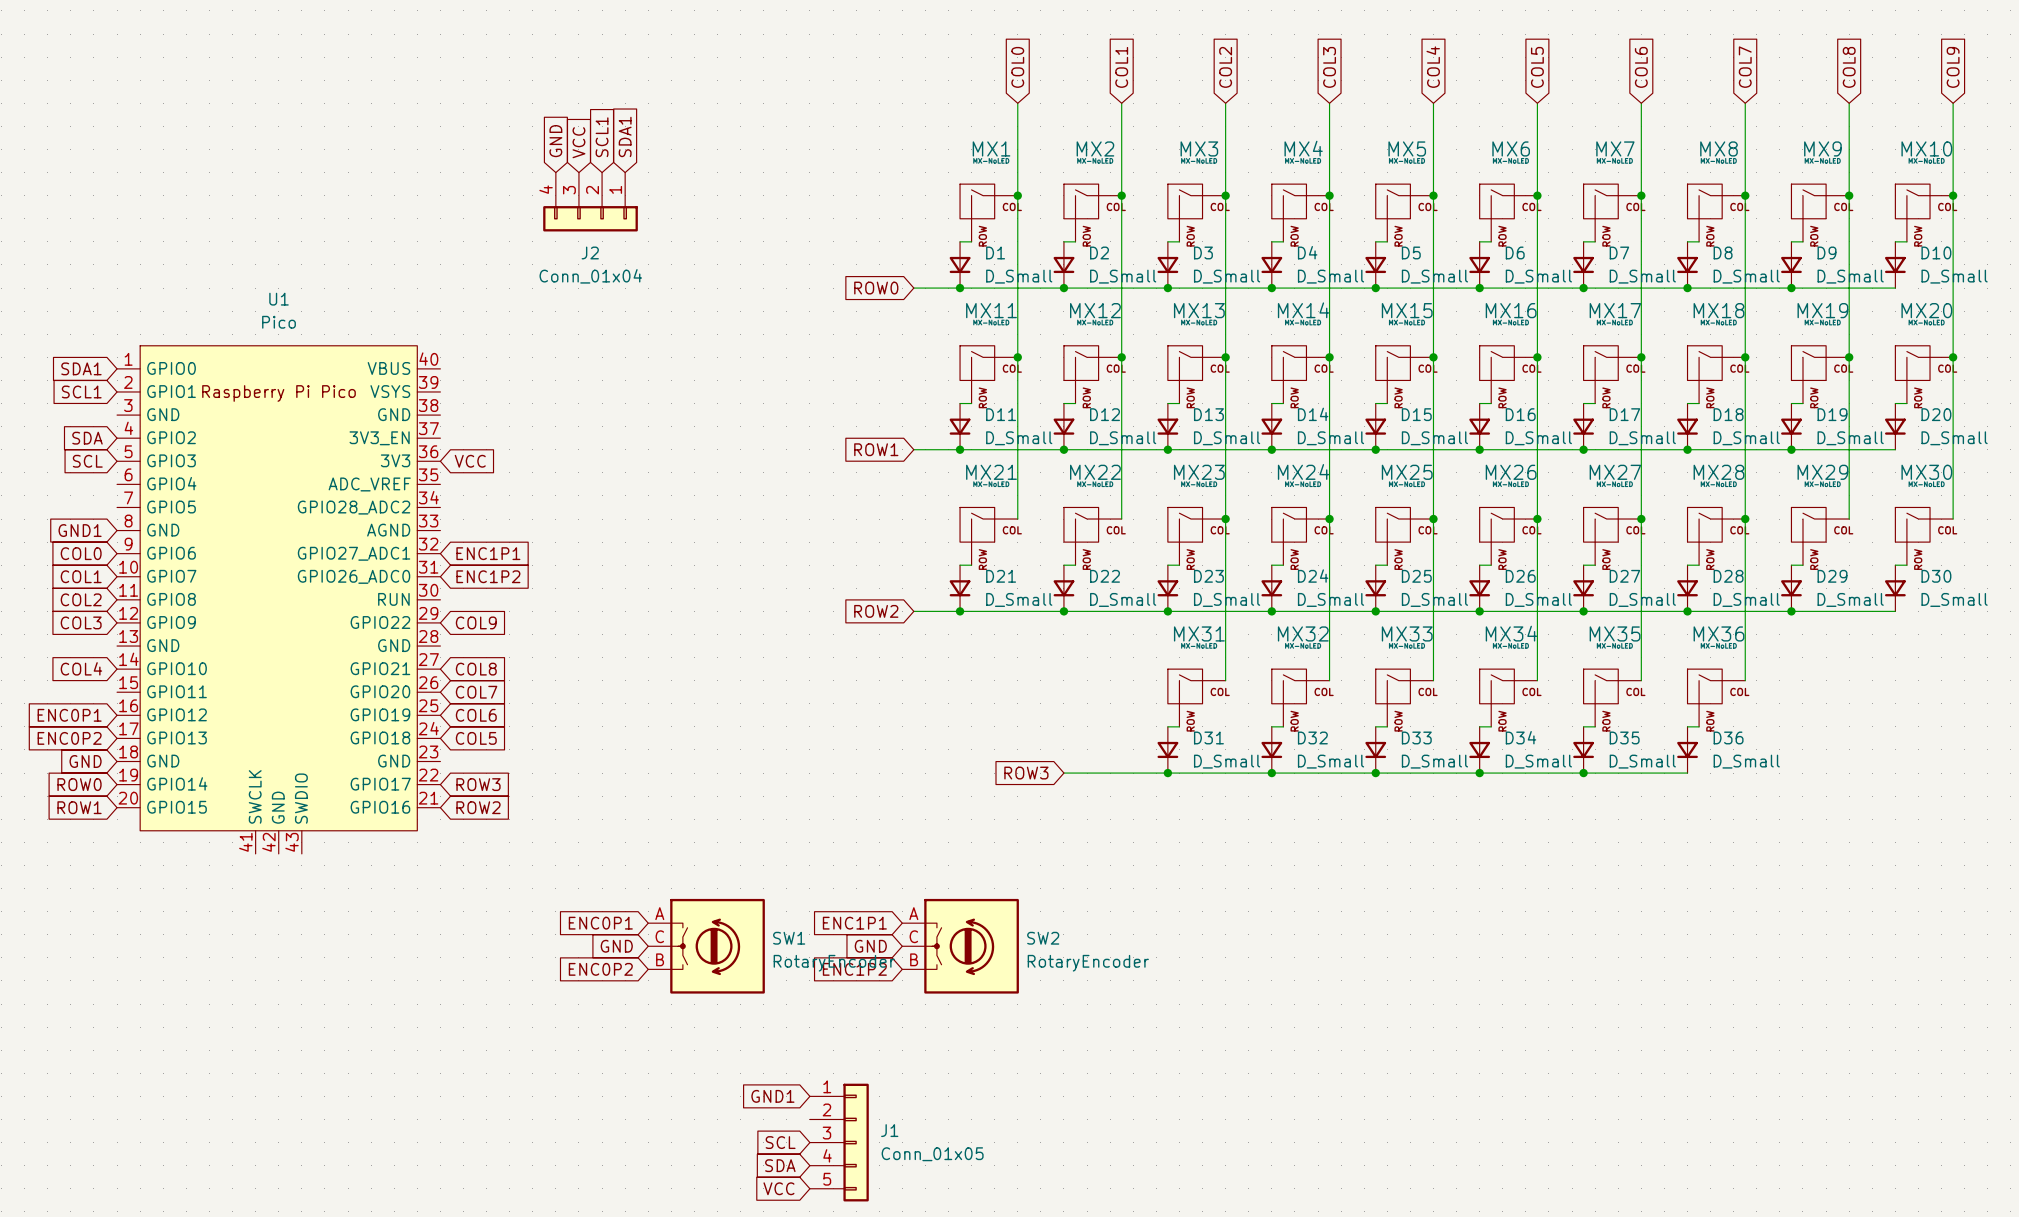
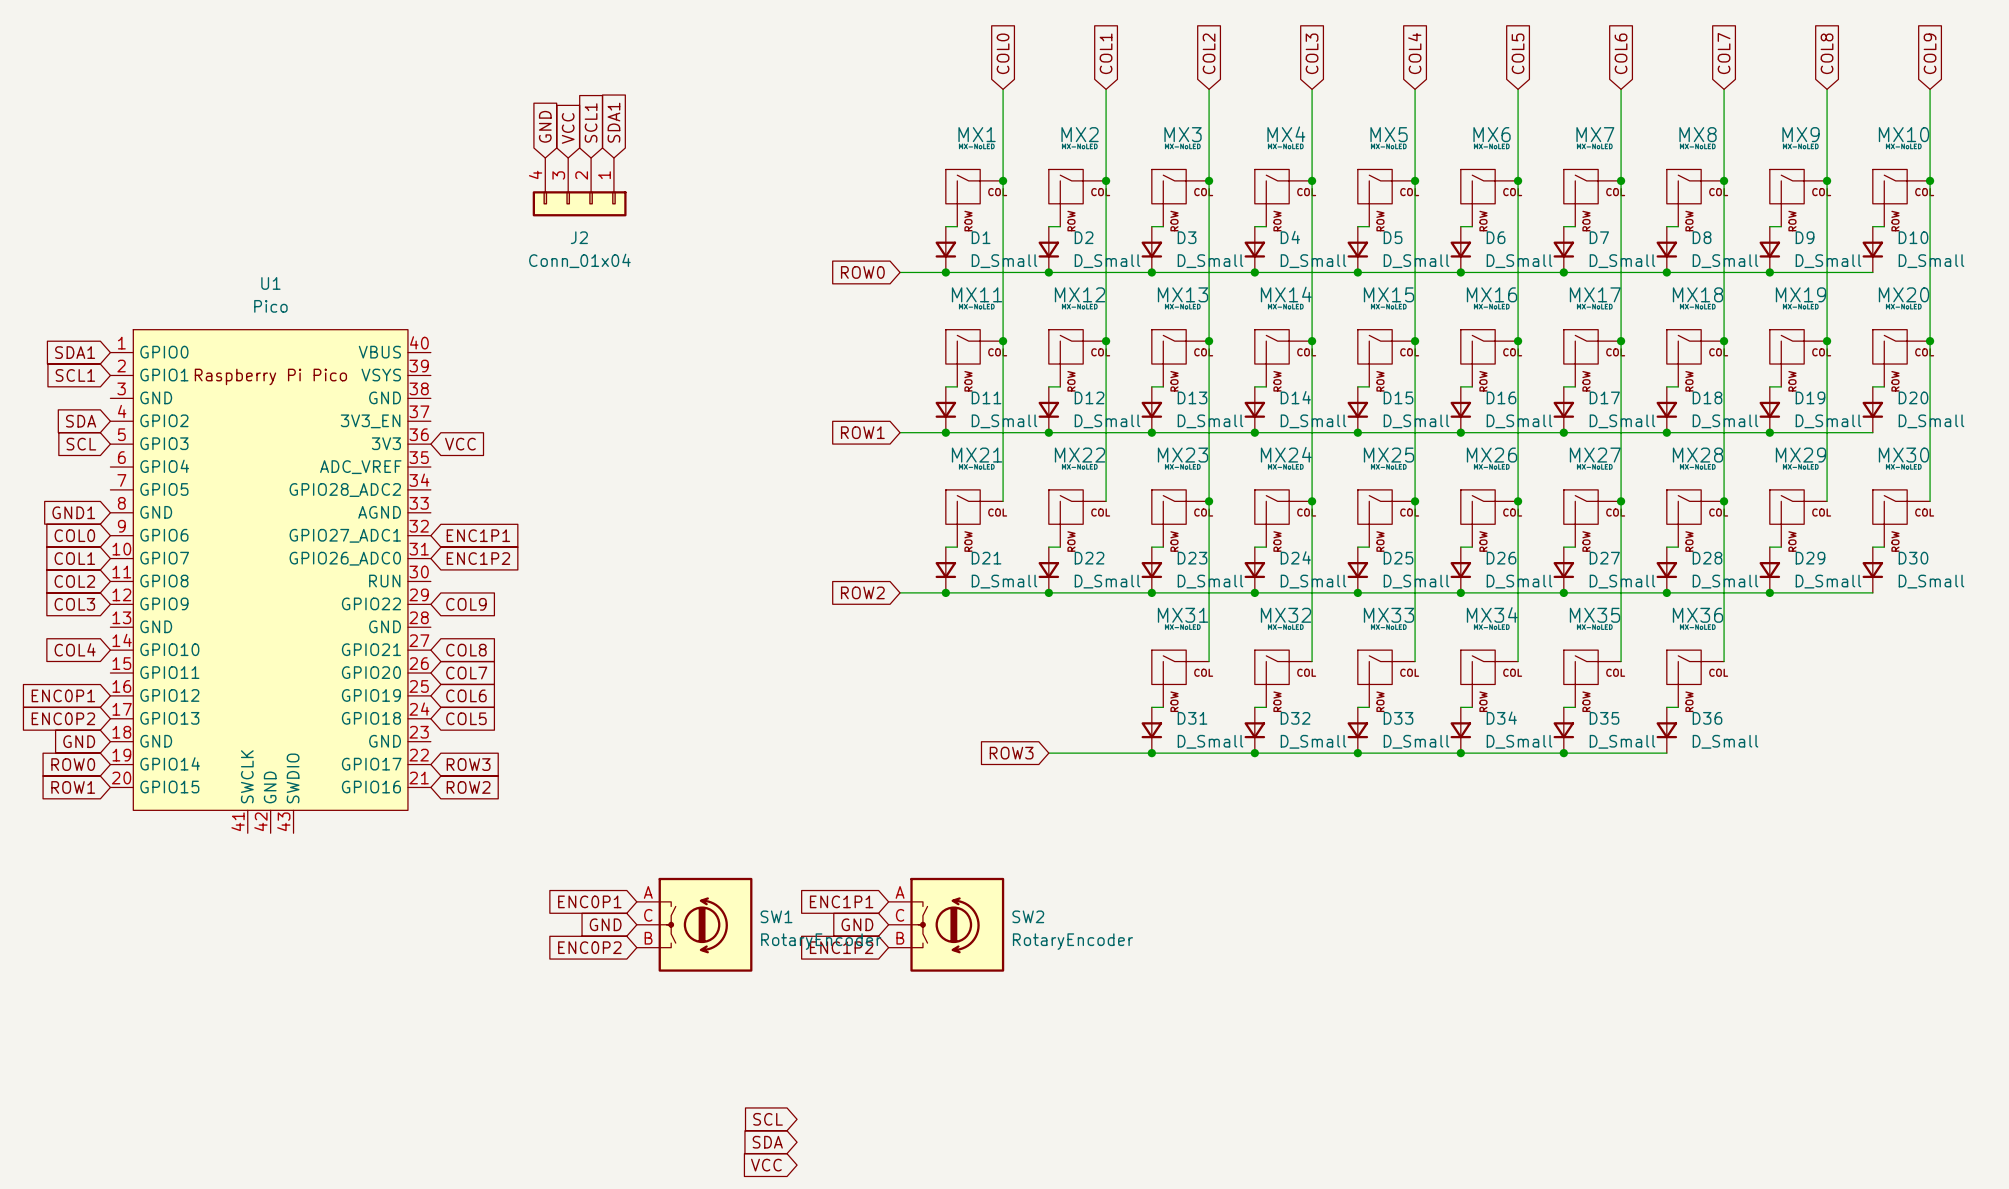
global label: GND1 (772, 1096) -> none
J1: Conn_01x05 (839, 1142) -> none

